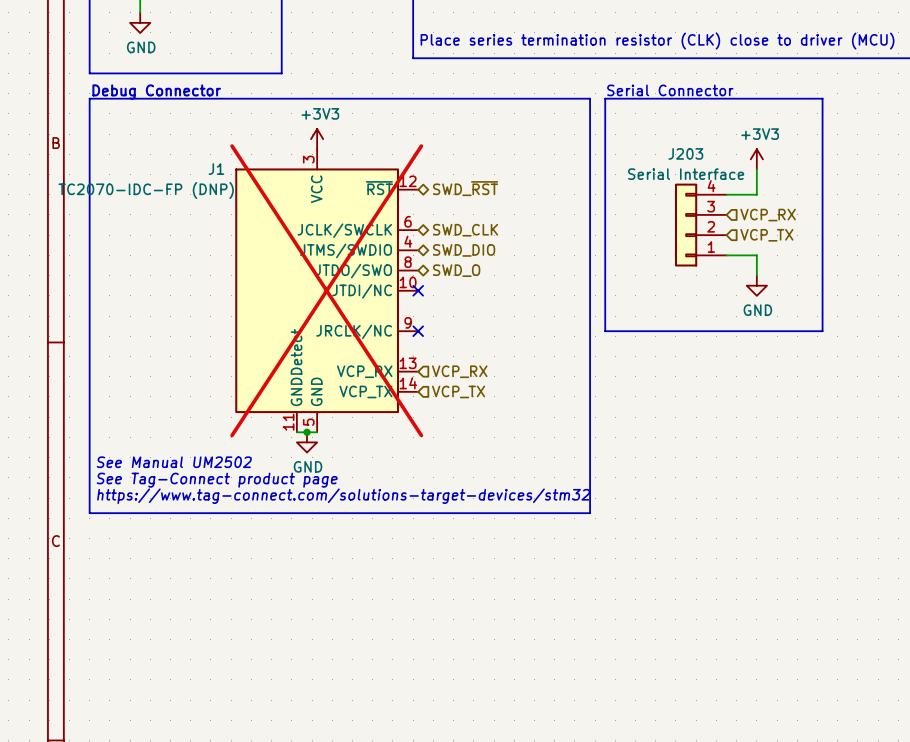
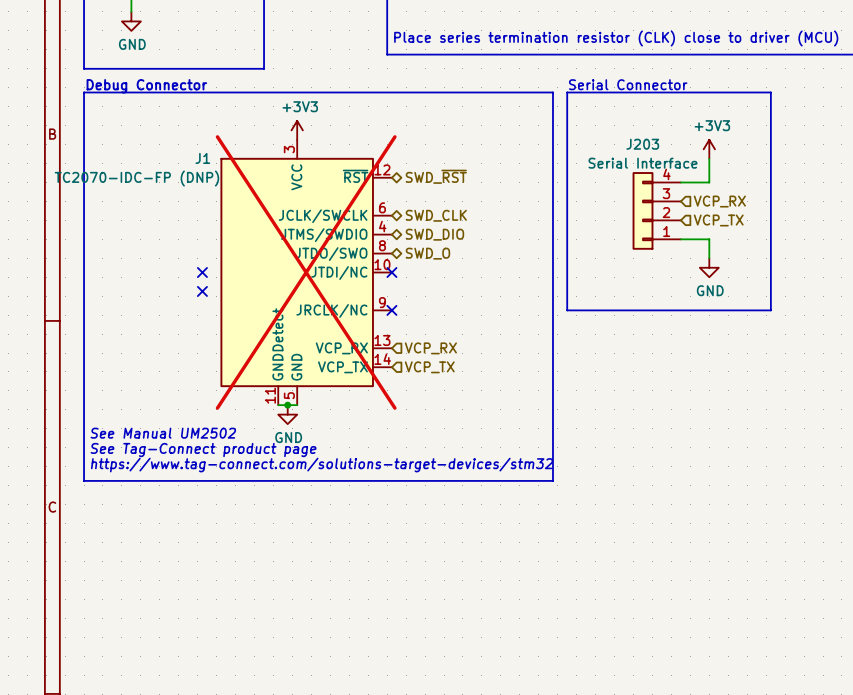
no-connect mark: none -> (202, 272)
no-connect mark: none -> (202, 291)

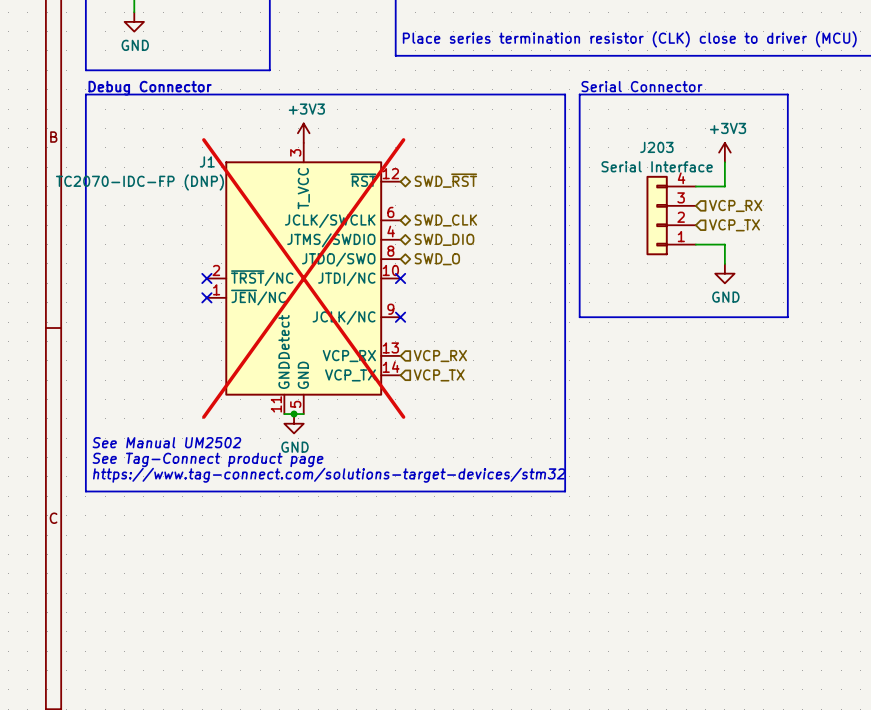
J1 symbol: [220, 139, 392, 406] -> [206, 142, 401, 415]

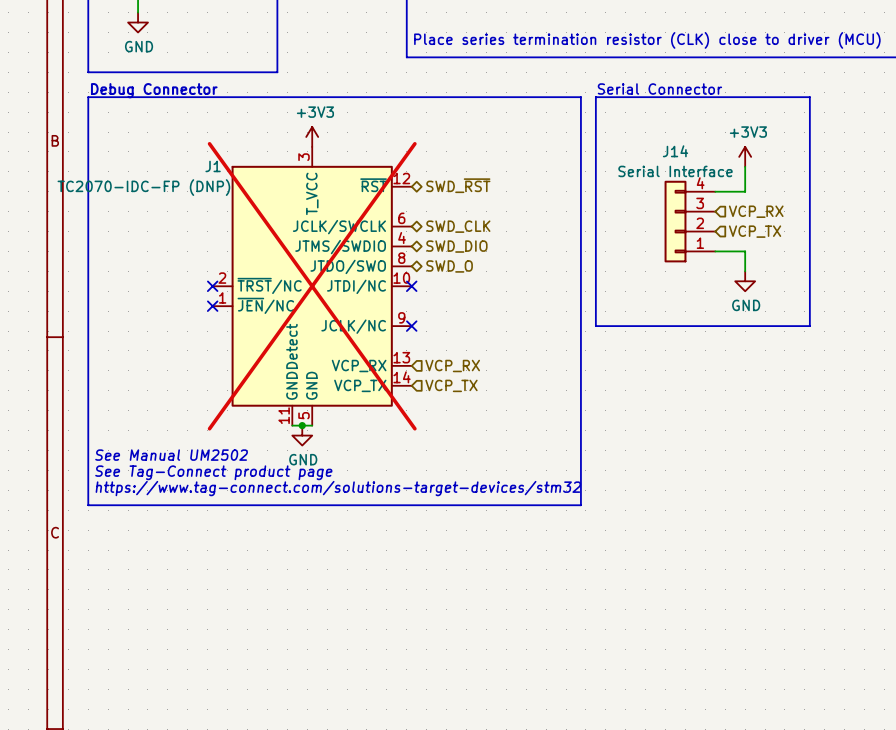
J203 name: J203 (656, 147) -> J14 (675, 151)

